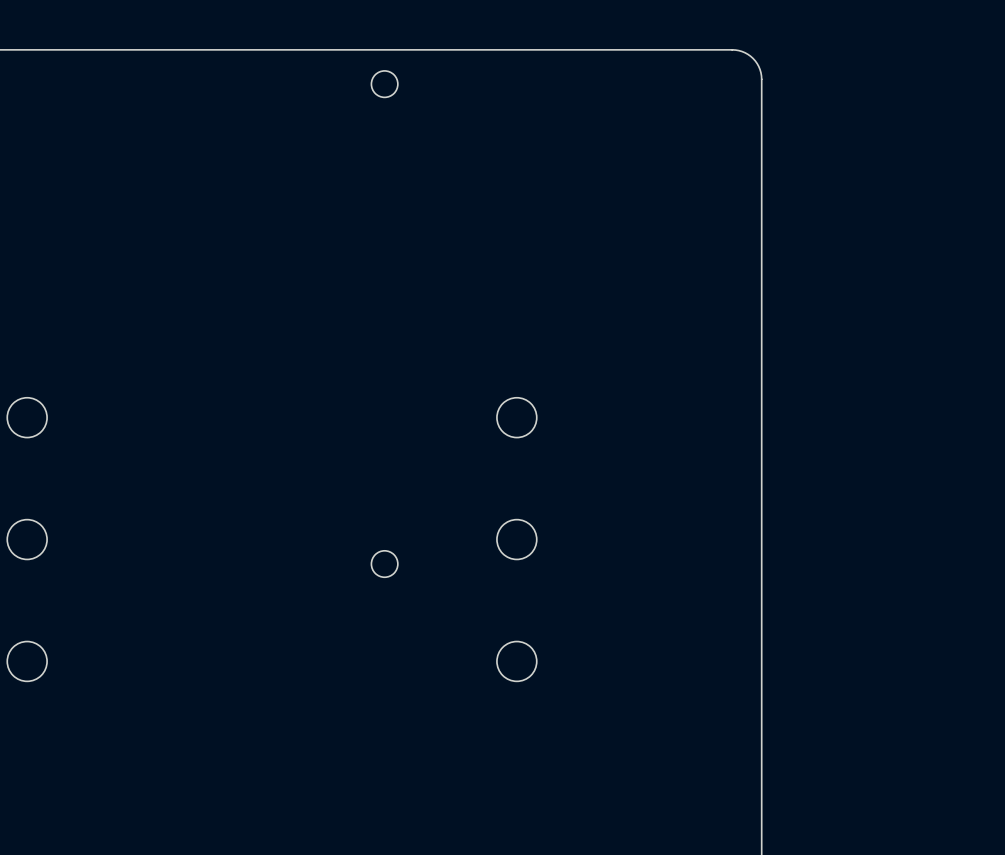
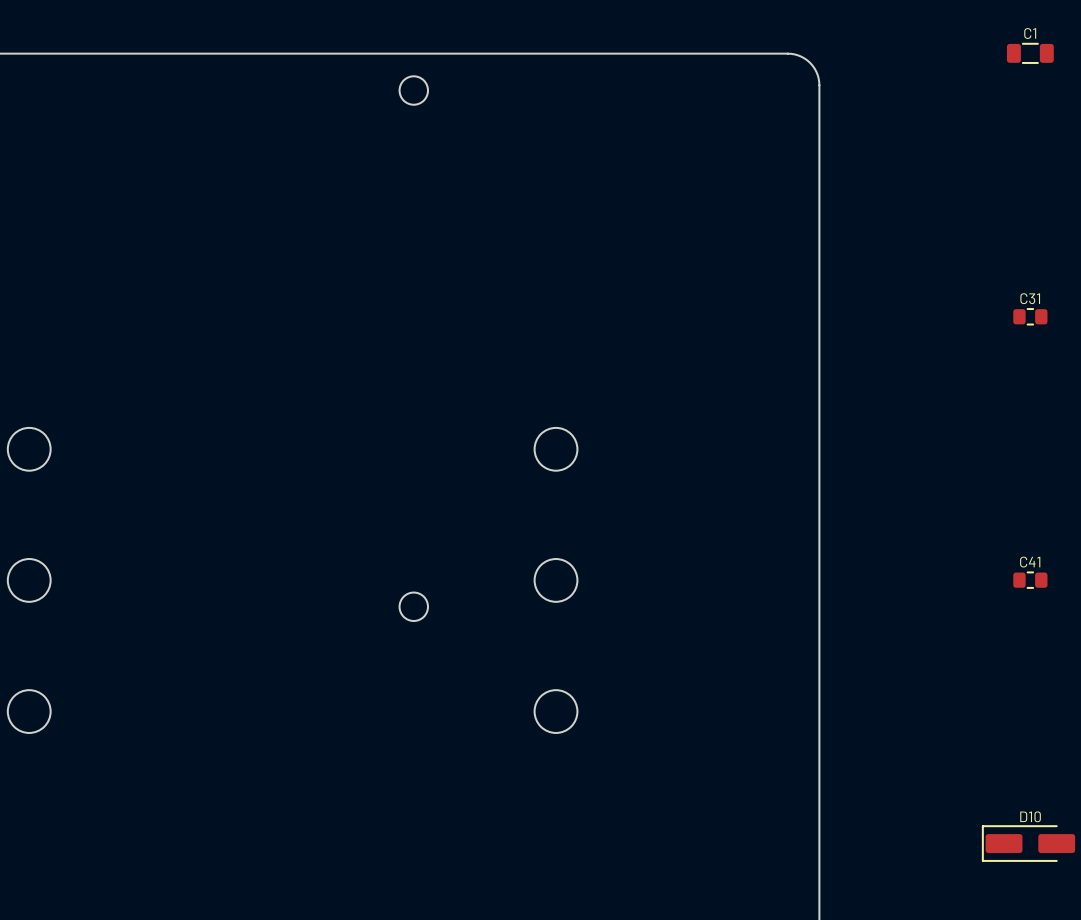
C1: none -> (1030, 53)
C31: none -> (1030, 316)
C41: none -> (1030, 580)
D10: none -> (1028, 843)

